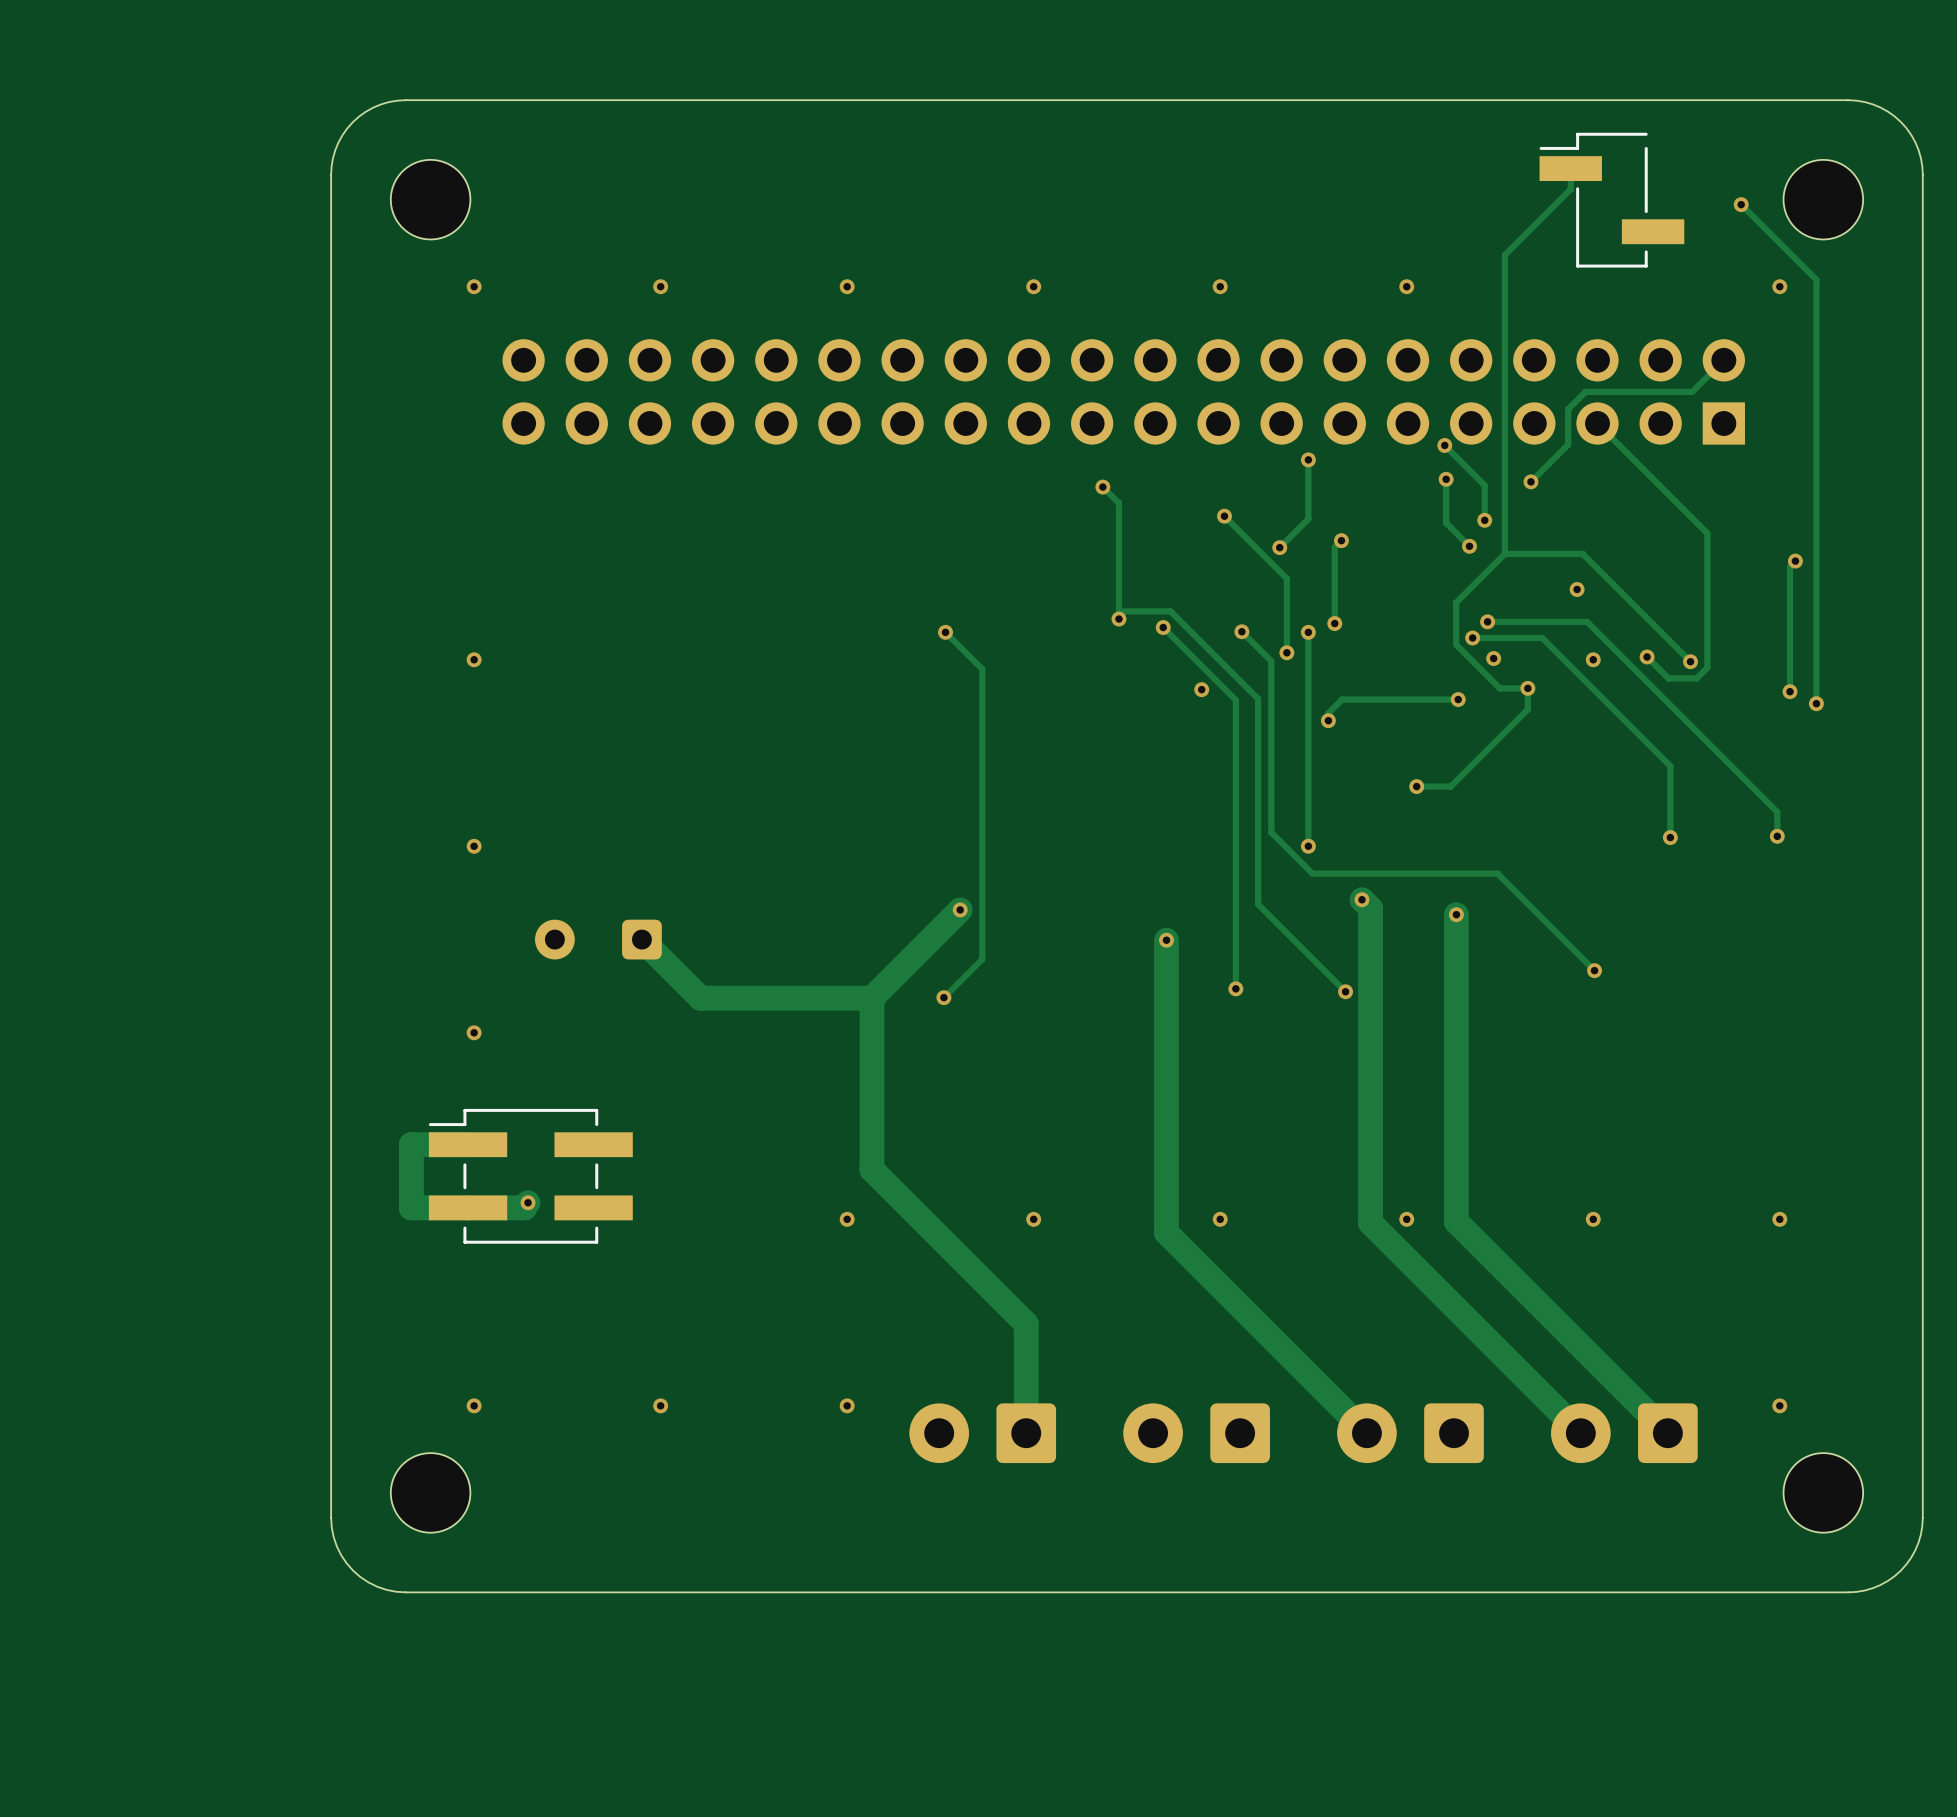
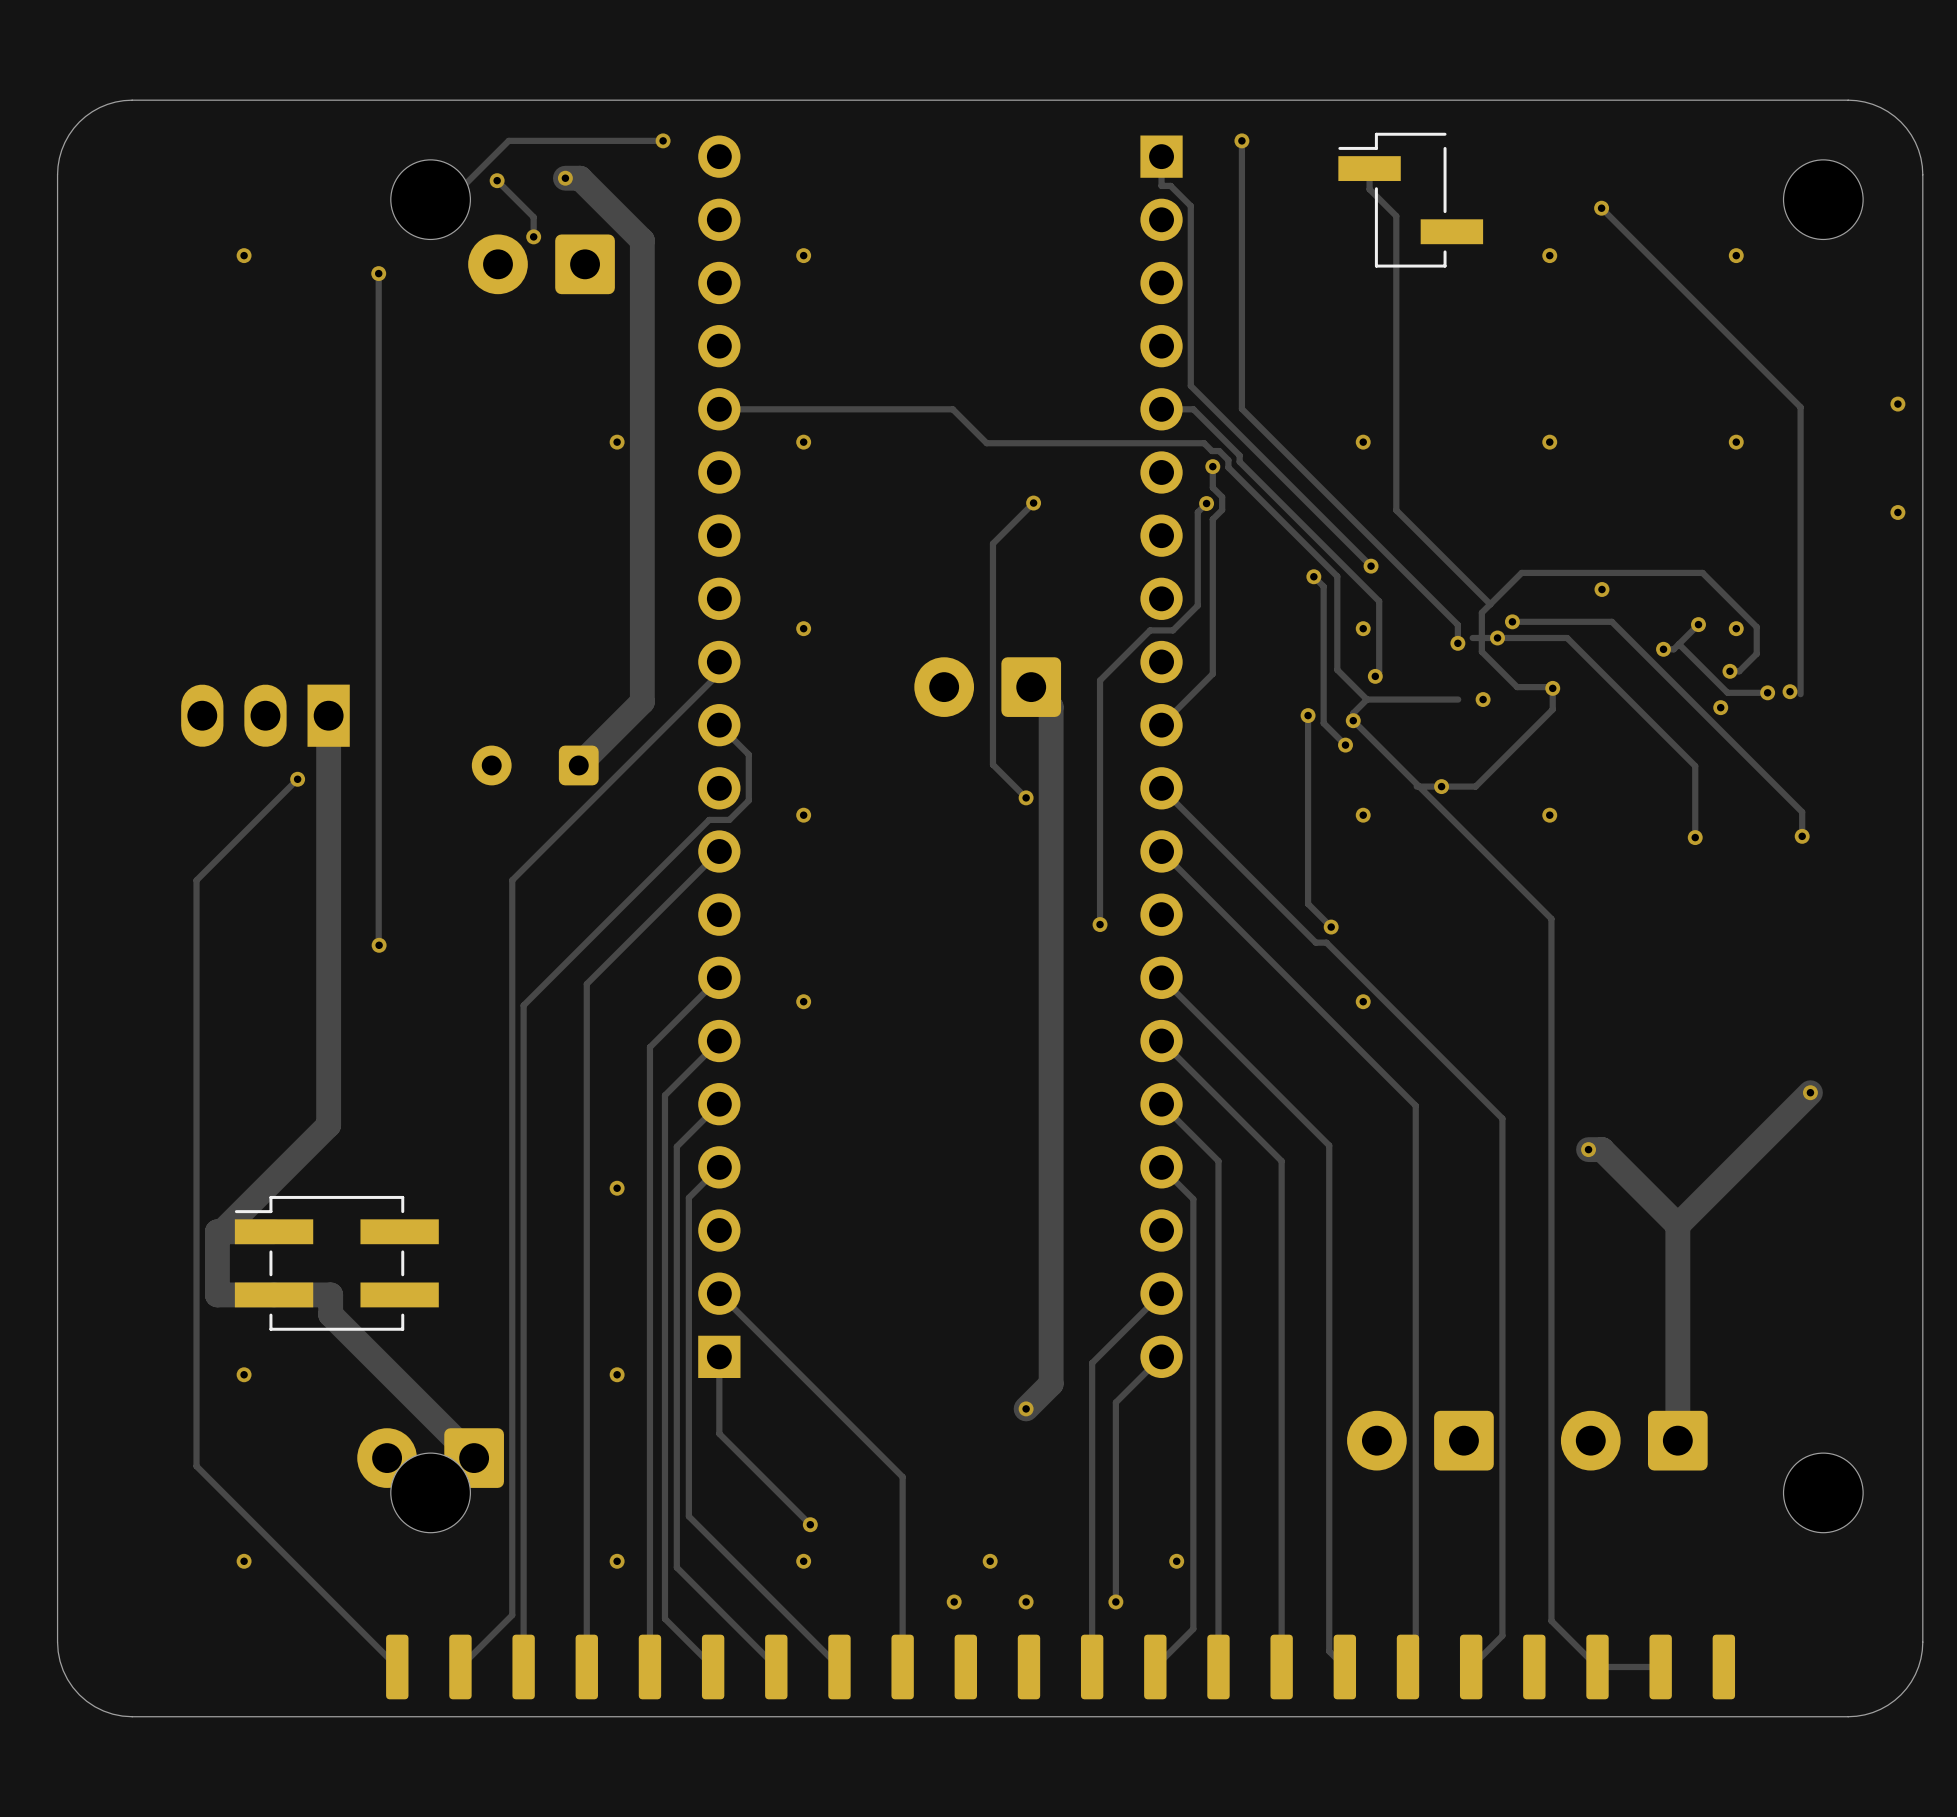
board edge: (405, 100) (381, 104) (366, 111) (352, 122) (338, 142) (333, 158) (331, 174) (331, 1517) (336, 1546) (352, 1570) (377, 1586) (405, 1592) (1848, 1592) (1864, 1590) (1880, 1584) (1900, 1570) (1915, 1550) (1920, 1534) (1922, 1517) -> (405, 100) (123, 100) (99, 107) (79, 122) (64, 142) (59, 158) (57, 174) (57, 1642) (63, 1670) (79, 1694) (103, 1711) (132, 1716) (1856, 1716) (1880, 1709) (1894, 1700) (1911, 1681) (1918, 1666) (1922, 1642) (1922, 1517)
track: none -> (663, 140) (508, 140) (465, 183)
via: none -> (663, 140)
track: none -> (1241, 140) (1241, 408) (1457, 624) (1457, 643)
via: none -> (1241, 140)
track: none -> (1161, 156) (1161, 185) (1170, 185) (1190, 206) (1190, 385) (1371, 566)
track: none -> (1369, 168) (1369, 189) (1396, 216) (1396, 510) (1490, 604)
track: (1570, 168) (1570, 189) (1504, 255) (1504, 553) -> none
track: none -> (565, 178) (580, 178) (642, 240) (642, 701) (578, 765)
via: none -> (565, 178)
track: none -> (497, 180) (533, 217) (533, 236)
via: none -> (497, 180)
part position: (1611, 200) -> (1410, 200)
track: (1741, 204) (1816, 279) (1816, 703) -> none
via: (1741, 204) -> none
track: none -> (1601, 208) (1800, 407) (1800, 694)
via: none -> (1601, 208)
via: none -> (533, 236)
via: none -> (244, 255)
via: none -> (1549, 255)
via: none -> (1736, 255)
part: none -> (541, 264)
track: none -> (378, 273) (379, 945)
via: none -> (378, 273)
via: (474, 286) -> none
via: (660, 286) -> none
via position: (847, 286) -> (803, 255)
via: (1033, 286) -> none
via: (1220, 286) -> none
via: (1406, 286) -> none
via: (1779, 286) -> none
track: (1723, 360) (1692, 391) (1585, 391) (1568, 409) (1568, 444) (1530, 481) -> none
part: (1123, 391) -> none
via: none -> (1897, 404)
track: none -> (719, 409) (952, 409) (986, 443) (1204, 443) (1211, 451) (1219, 451) (1228, 460) (1228, 467) (1337, 576) (1337, 669) (1366, 699) (1353, 713) (1353, 720) (1551, 918) (1551, 1620) (1597, 1666) (1660, 1666)
track: none -> (1161, 409) (1193, 409) (1239, 455) (1239, 461) (1379, 601) (1379, 672) (1375, 676)
track: (1597, 423) (1707, 533) (1707, 667) (1696, 678) (1668, 678) -> (1802, 836) (1802, 812) (1668, 678)
via: none -> (617, 442)
via: none -> (803, 442)
via: none -> (1363, 442)
via: none -> (1736, 442)
track: (1444, 445) (1484, 485) (1484, 520) -> none
via: (1444, 445) -> none
track: (1308, 459) (1308, 518) (1279, 547) -> none
via: (1308, 459) -> none
track: none -> (1212, 466) (1212, 487) (1222, 497) (1222, 509) (1212, 519) (1212, 673) (1161, 725)
via: none -> (1212, 466)
track: (1446, 479) (1446, 522) (1469, 546) -> none
via: (1446, 479) -> none
via position: (1530, 481) -> (1549, 442)
track: (1102, 487) (1118, 503) (1118, 619) -> none
via: (1102, 487) -> none
track: none -> (1033, 503) (992, 543) (992, 764) (1026, 797)
via: none -> (1033, 503)
track: none -> (1206, 503) (1197, 512) (1197, 605) (1173, 630) (1150, 630) (1100, 680) (1100, 924)
via: none -> (1897, 512)
track: (1224, 516) (1286, 578) (1286, 652) -> none
via position: (1224, 516) -> (1206, 503)
via: (1484, 520) -> none
track: (1341, 540) (1334, 547) (1334, 623) -> none
via: (1341, 540) -> none
via: (1469, 546) -> none
via: (1279, 547) -> none
track: (1504, 553) (1456, 602) (1456, 644) (1499, 688) (1527, 688) (1527, 709) (1450, 786) -> (1729, 671) (1739, 671) (1756, 653) (1756, 627) (1702, 572) (1521, 572) (1481, 612) (1481, 651) (1517, 687) (1551, 687) (1552, 709) (1475, 786) (1450, 786)
track: (1504, 553) (1582, 553) (1690, 661) -> none
track: (1795, 561) (1790, 566) (1790, 691) -> none
via: (1795, 561) -> none
via: none -> (1371, 566)
track: none -> (1313, 576) (1323, 586) (1323, 723) (1345, 745)
via: none -> (1313, 576)
via position: (1577, 589) -> (1601, 589)
track: (1118, 611) (1170, 611) (1258, 698) (1258, 904) (1345, 991) -> none
via: (1118, 619) -> none
via: (1487, 621) -> none
track: (1512, 621) (1487, 621) -> none
via: none -> (1512, 621)
track: (1587, 621) (1777, 812) (1777, 836) -> (1587, 621) (1611, 621) (1647, 656)
via: (1334, 623) -> none
track: none -> (1698, 624) (1673, 649) (1663, 649)
via: none -> (1698, 624)
track: (1163, 627) (1235, 700) (1235, 988) -> none
via: (1163, 627) -> none
via: none -> (803, 628)
via: none -> (1363, 628)
via: none -> (1736, 628)
track: (1241, 631) (1271, 661) (1271, 832) (1312, 873) (1497, 873) (1594, 970) -> none
via: (1241, 631) -> none
track: (945, 632) (982, 669) (982, 959) (943, 997) -> none
via: (945, 632) -> none
track: (1308, 632) (1308, 846) -> none
via: (1308, 632) -> none
via position: (1472, 637) -> (1457, 643)
via: none -> (1497, 637)
track: (1542, 637) (1670, 766) (1670, 837) -> (1542, 637) (1567, 637) (1695, 766) (1695, 837)
track: none -> (1678, 644) (1727, 692) (1767, 692)
via: none -> (1663, 649)
via: (1286, 652) -> none
via: (1647, 656) -> none
via: (1493, 658) -> none
via: (474, 659) -> none
via: (1593, 659) -> none
track: none -> (719, 661) (719, 673) (512, 880) (512, 1615) (460, 1666)
via: (1690, 661) -> none
via: none -> (1729, 671)
via: none -> (1375, 676)
part: none -> (987, 687)
track: none -> (1031, 687) (1051, 707) (1051, 1383) (1026, 1408)
via: (1527, 688) -> none
via: none -> (1552, 688)
via: (1201, 689) -> none
via: none -> (1767, 692)
track: (1366, 699) (1342, 699) (1328, 713) (1328, 720) -> none
via: (1458, 699) -> none
via: none -> (1483, 699)
via: (1816, 703) -> none
via: none -> (1720, 707)
part: none -> (265, 715)
track: none -> (328, 715) (328, 1125) (222, 1231)
track: none -> (1308, 715) (1308, 903) (1331, 927)
via: none -> (1308, 715)
via: (1328, 720) -> none
via: none -> (1353, 720)
track: none -> (719, 725) (748, 754) (748, 800) (729, 819) (709, 819) (523, 1005) (523, 1666)
via: none -> (1345, 745)
part: none -> (719, 756)
part: none -> (1161, 756)
track: none -> (297, 779) (196, 880) (196, 1466) (397, 1666)
via: none -> (297, 779)
via position: (1416, 786) -> (1441, 786)
track: none -> (1161, 788) (1315, 942) (1326, 942) (1502, 1118) (1502, 1635) (1471, 1666)
via: none -> (1026, 797)
via: none -> (803, 815)
via: none -> (1363, 815)
via: none -> (1549, 815)
via position: (1777, 836) -> (1802, 836)
via position: (1670, 837) -> (1695, 837)
via: (474, 846) -> none
via: (1308, 846) -> none
track: none -> (719, 851) (586, 984) (586, 1666)
track: none -> (1161, 851) (1415, 1105) (1415, 1659) (1407, 1666)
track: (1361, 899) (1370, 908) (1370, 1222) (1580, 1433) -> none
via: (1361, 899) -> none
track: (960, 909) (871, 998) -> none
via: (960, 909) -> none
track: (1456, 914) (1456, 1221) (1667, 1433) -> none
via: (1456, 914) -> none
via: none -> (1331, 927)
part position: (598, 939) -> (535, 765)
track: (641, 939) (700, 998) (871, 998) -> none
track: (1166, 940) (1166, 1232) (1366, 1433) -> none
via position: (1166, 940) -> (1100, 924)
via: none -> (379, 945)
via: (1594, 970) -> none
track: none -> (719, 977) (649, 1047) (649, 1666)
track: none -> (1161, 977) (1329, 1145) (1329, 1651) (1344, 1666)
via: (1235, 988) -> none
via position: (1345, 991) -> (1363, 1001)
via: (943, 997) -> none
track: (871, 998) (871, 1169) (1026, 1323) (1026, 1433) -> none
via: none -> (803, 1001)
via: (474, 1032) -> none
track: none -> (719, 1041) (664, 1095) (664, 1618) (713, 1666)
track: none -> (1161, 1041) (1281, 1161) (1281, 1666)
track: none -> (1810, 1092) (1677, 1225)
via: none -> (1810, 1092)
track: none -> (719, 1104) (676, 1146) (676, 1567) (776, 1666)
track: none -> (1161, 1104) (1218, 1161) (1218, 1666)
track: (468, 1144) (411, 1144) (411, 1207) (524, 1207) (528, 1202) -> none
track: none -> (1588, 1149) (1602, 1149) (1677, 1225)
track: none -> (719, 1167) (688, 1197) (688, 1516) (839, 1666)
track: none -> (1161, 1167) (1193, 1199) (1193, 1628) (1155, 1666)
part position: (530, 1176) -> (336, 1263)
via position: (528, 1202) -> (617, 1188)
via: (847, 1219) -> none
via: (1033, 1219) -> none
via: (1220, 1219) -> none
via: (1406, 1219) -> none
via position: (1593, 1219) -> (1588, 1149)
via: (1779, 1219) -> none
track: none -> (1677, 1225) (1677, 1440)
track: none -> (274, 1231) (217, 1231) (217, 1294) (330, 1294) (330, 1314) (474, 1458)
track: none -> (719, 1293) (902, 1476) (902, 1666)
track: none -> (1161, 1293) (1092, 1363) (1092, 1666)
track: none -> (719, 1356) (719, 1433) (810, 1524)
track: none -> (1161, 1356) (1115, 1402) (1115, 1601)
via: none -> (244, 1374)
via: (474, 1405) -> none
via position: (660, 1405) -> (617, 1374)
via: (847, 1405) -> none
via: (1779, 1405) -> none
via: none -> (1026, 1408)
part: (982, 1433) -> none
part: (1196, 1433) -> none
part position: (1410, 1433) -> (1420, 1440)
part position: (1624, 1433) -> (1634, 1440)
part: none -> (430, 1458)
via: none -> (810, 1524)
via: none -> (244, 1561)
via: none -> (617, 1561)
via: none -> (803, 1561)
via: none -> (990, 1561)
via: none -> (1176, 1561)
via: none -> (954, 1601)
via: none -> (1026, 1601)
via: none -> (1115, 1601)
part: none -> (934, 1666)
part: none -> (1629, 1666)

